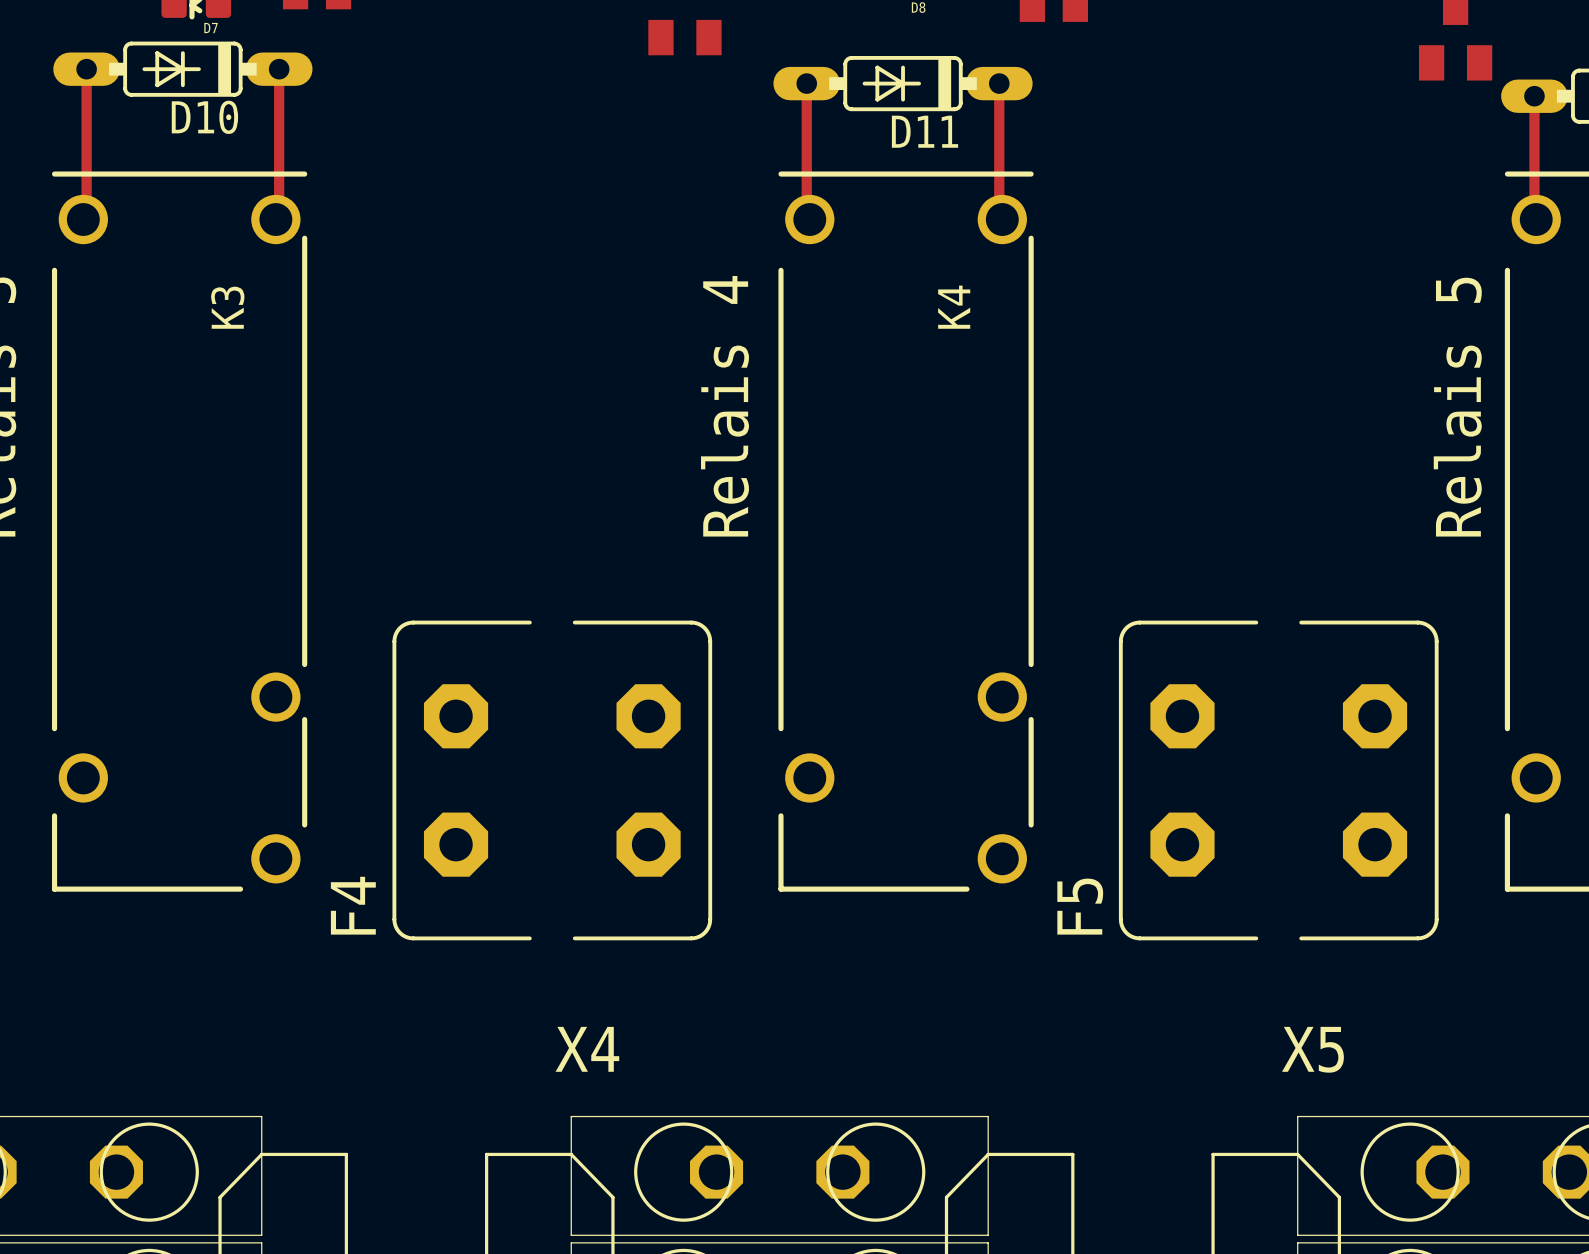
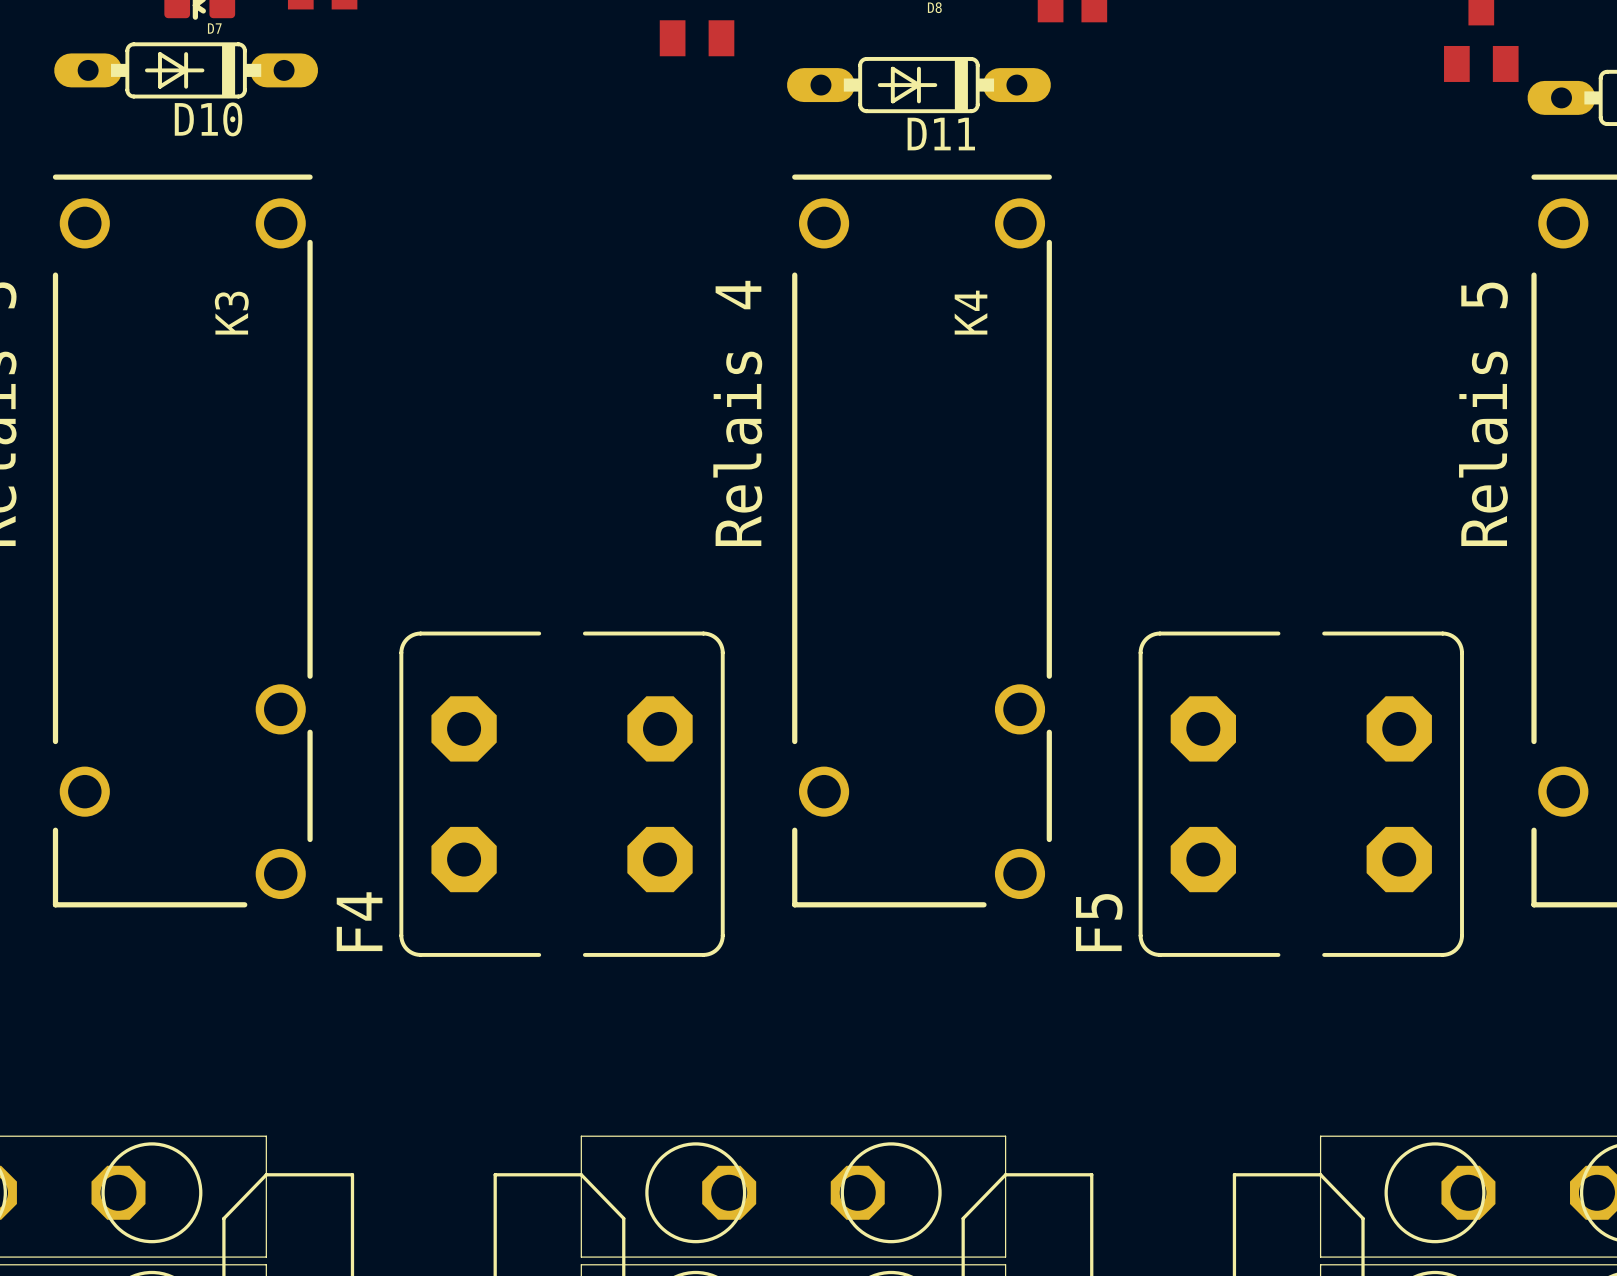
track: (86, 69) (86, 216) -> none
track: (279, 69) (279, 216) -> none
track: (806, 83) (806, 216) -> none
track: (999, 83) (999, 216) -> none
track: (1534, 96) (1534, 217) -> none
X4 name: X4 (587, 1049) -> none
X5 name: X5 (1312, 1049) -> none

